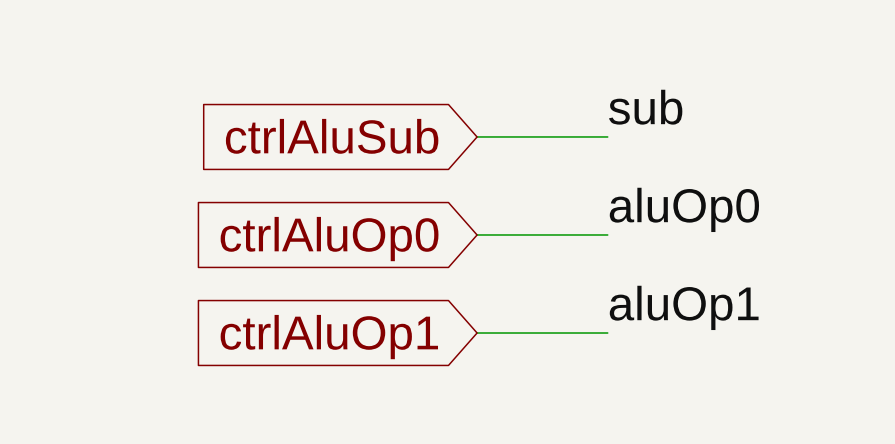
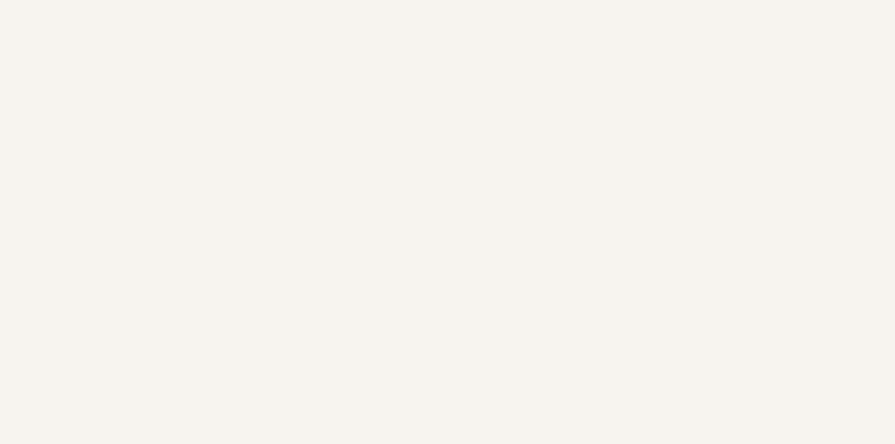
label: sub (645, 107) -> none
global label: ctrlAluSub (332, 136) -> none
wire: (477, 136) (607, 136) -> none
label: aluOp0 (684, 209) -> none
wire: (477, 234) (607, 234) -> none
global label: ctrlAluOp0 (329, 239) -> none
label: aluOp1 (684, 307) -> none
wire: (477, 333) (607, 333) -> none
global label: ctrlAluOp1 (329, 337) -> none

